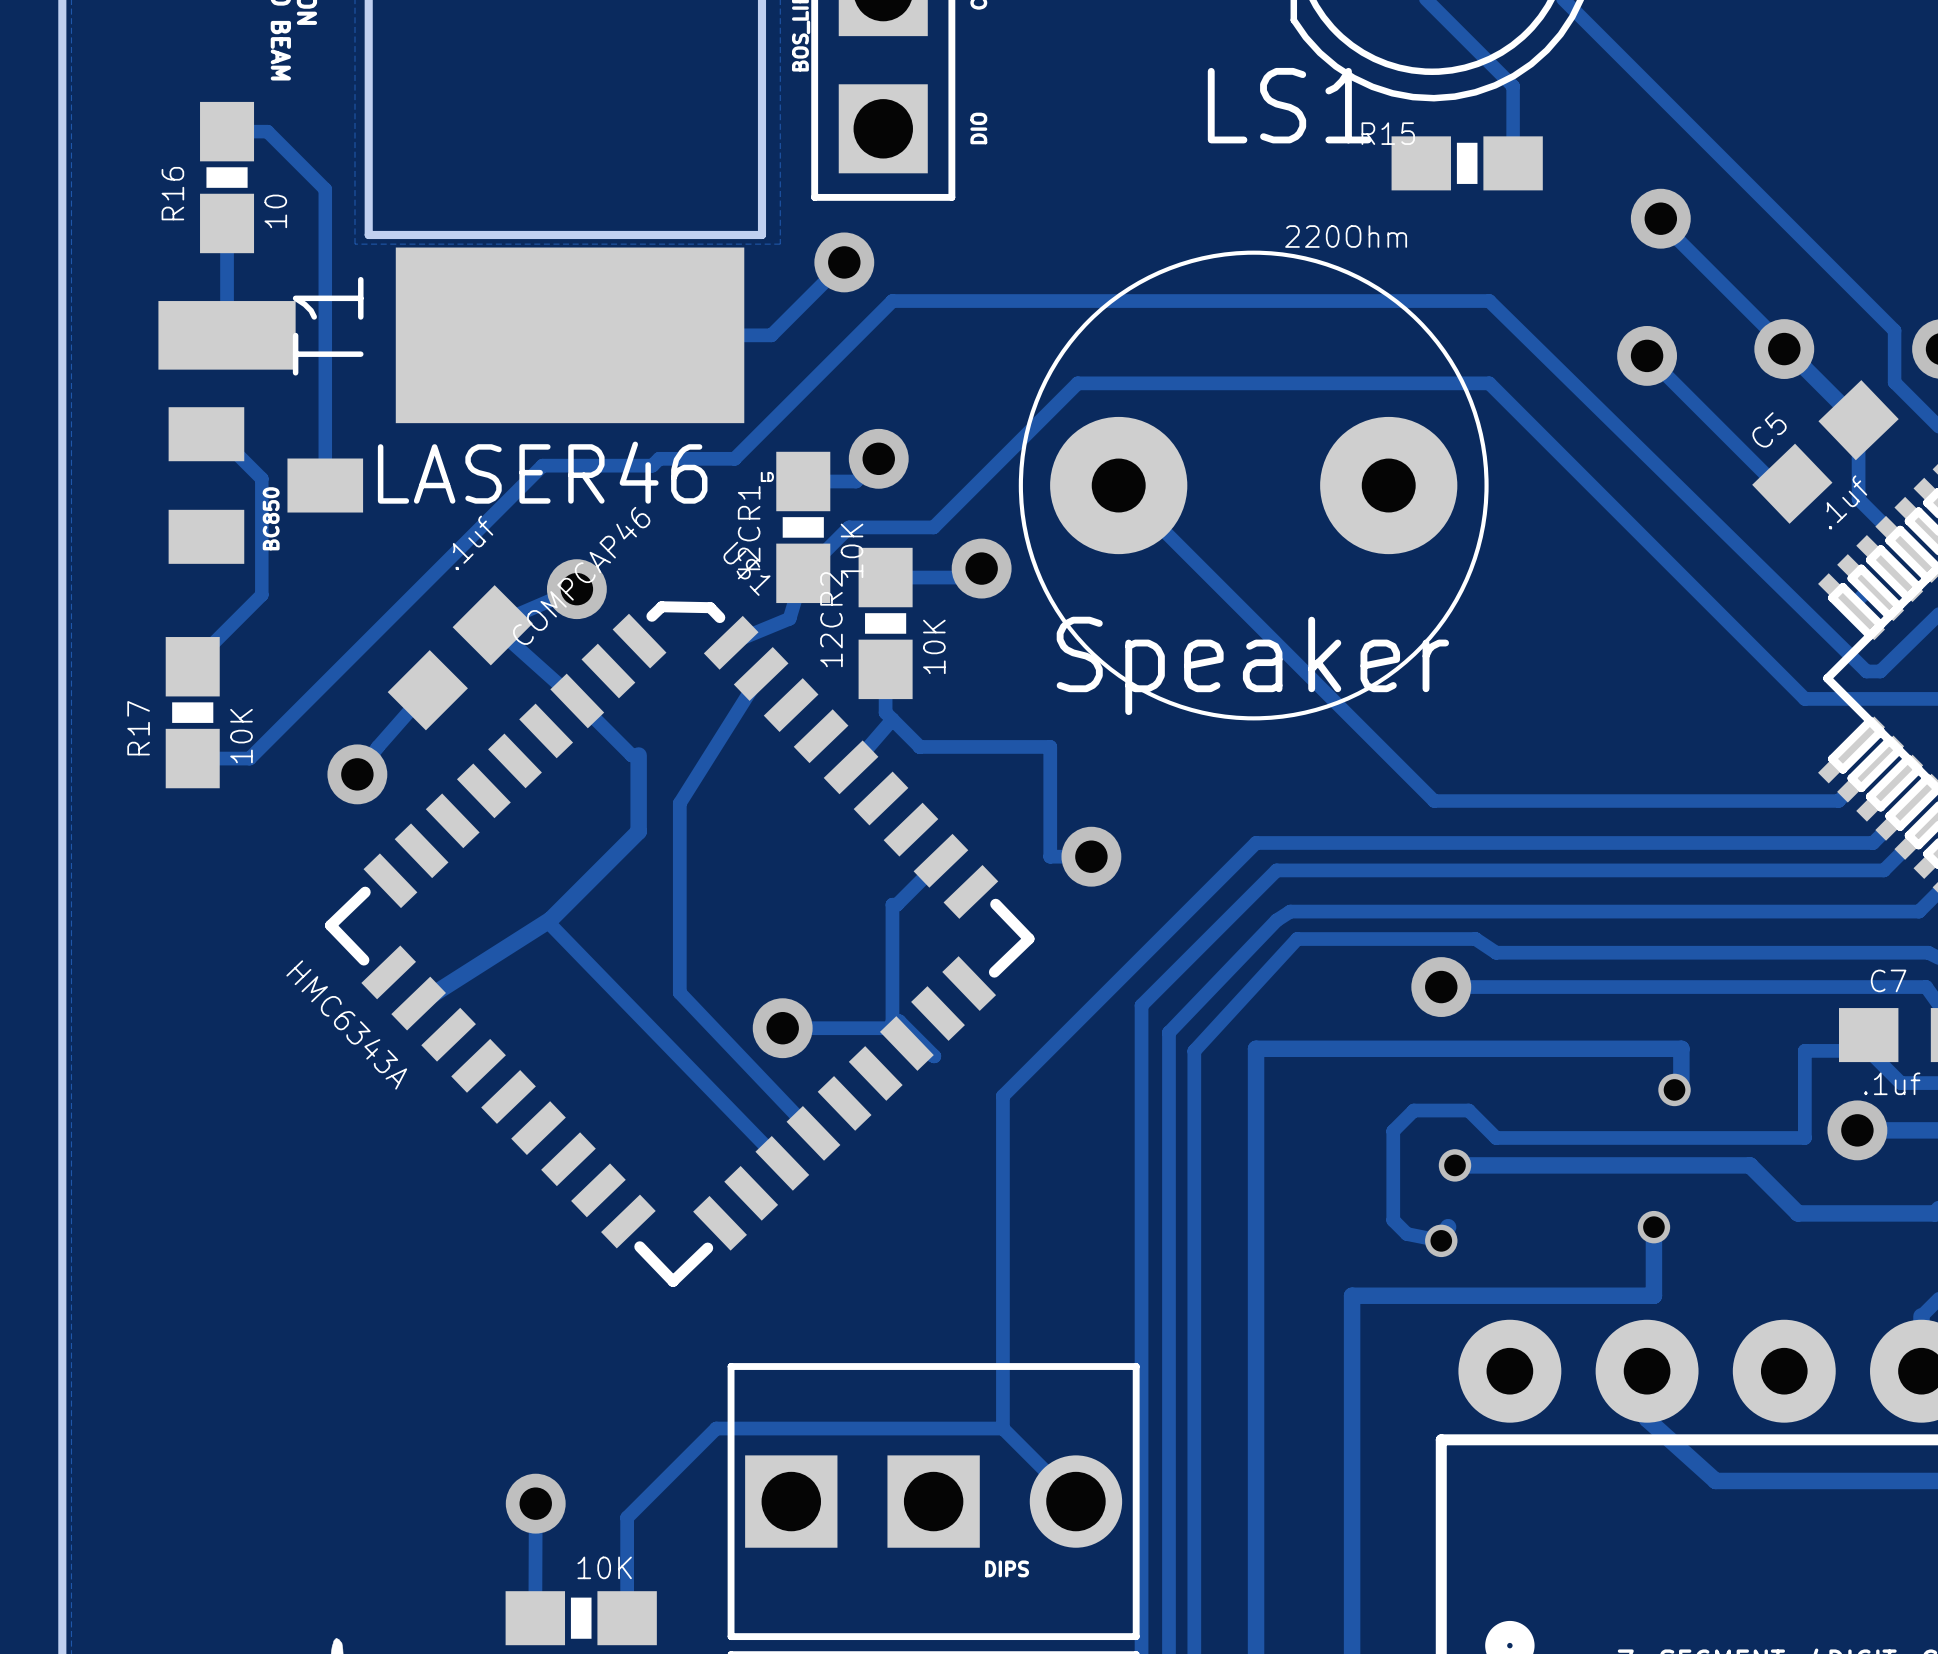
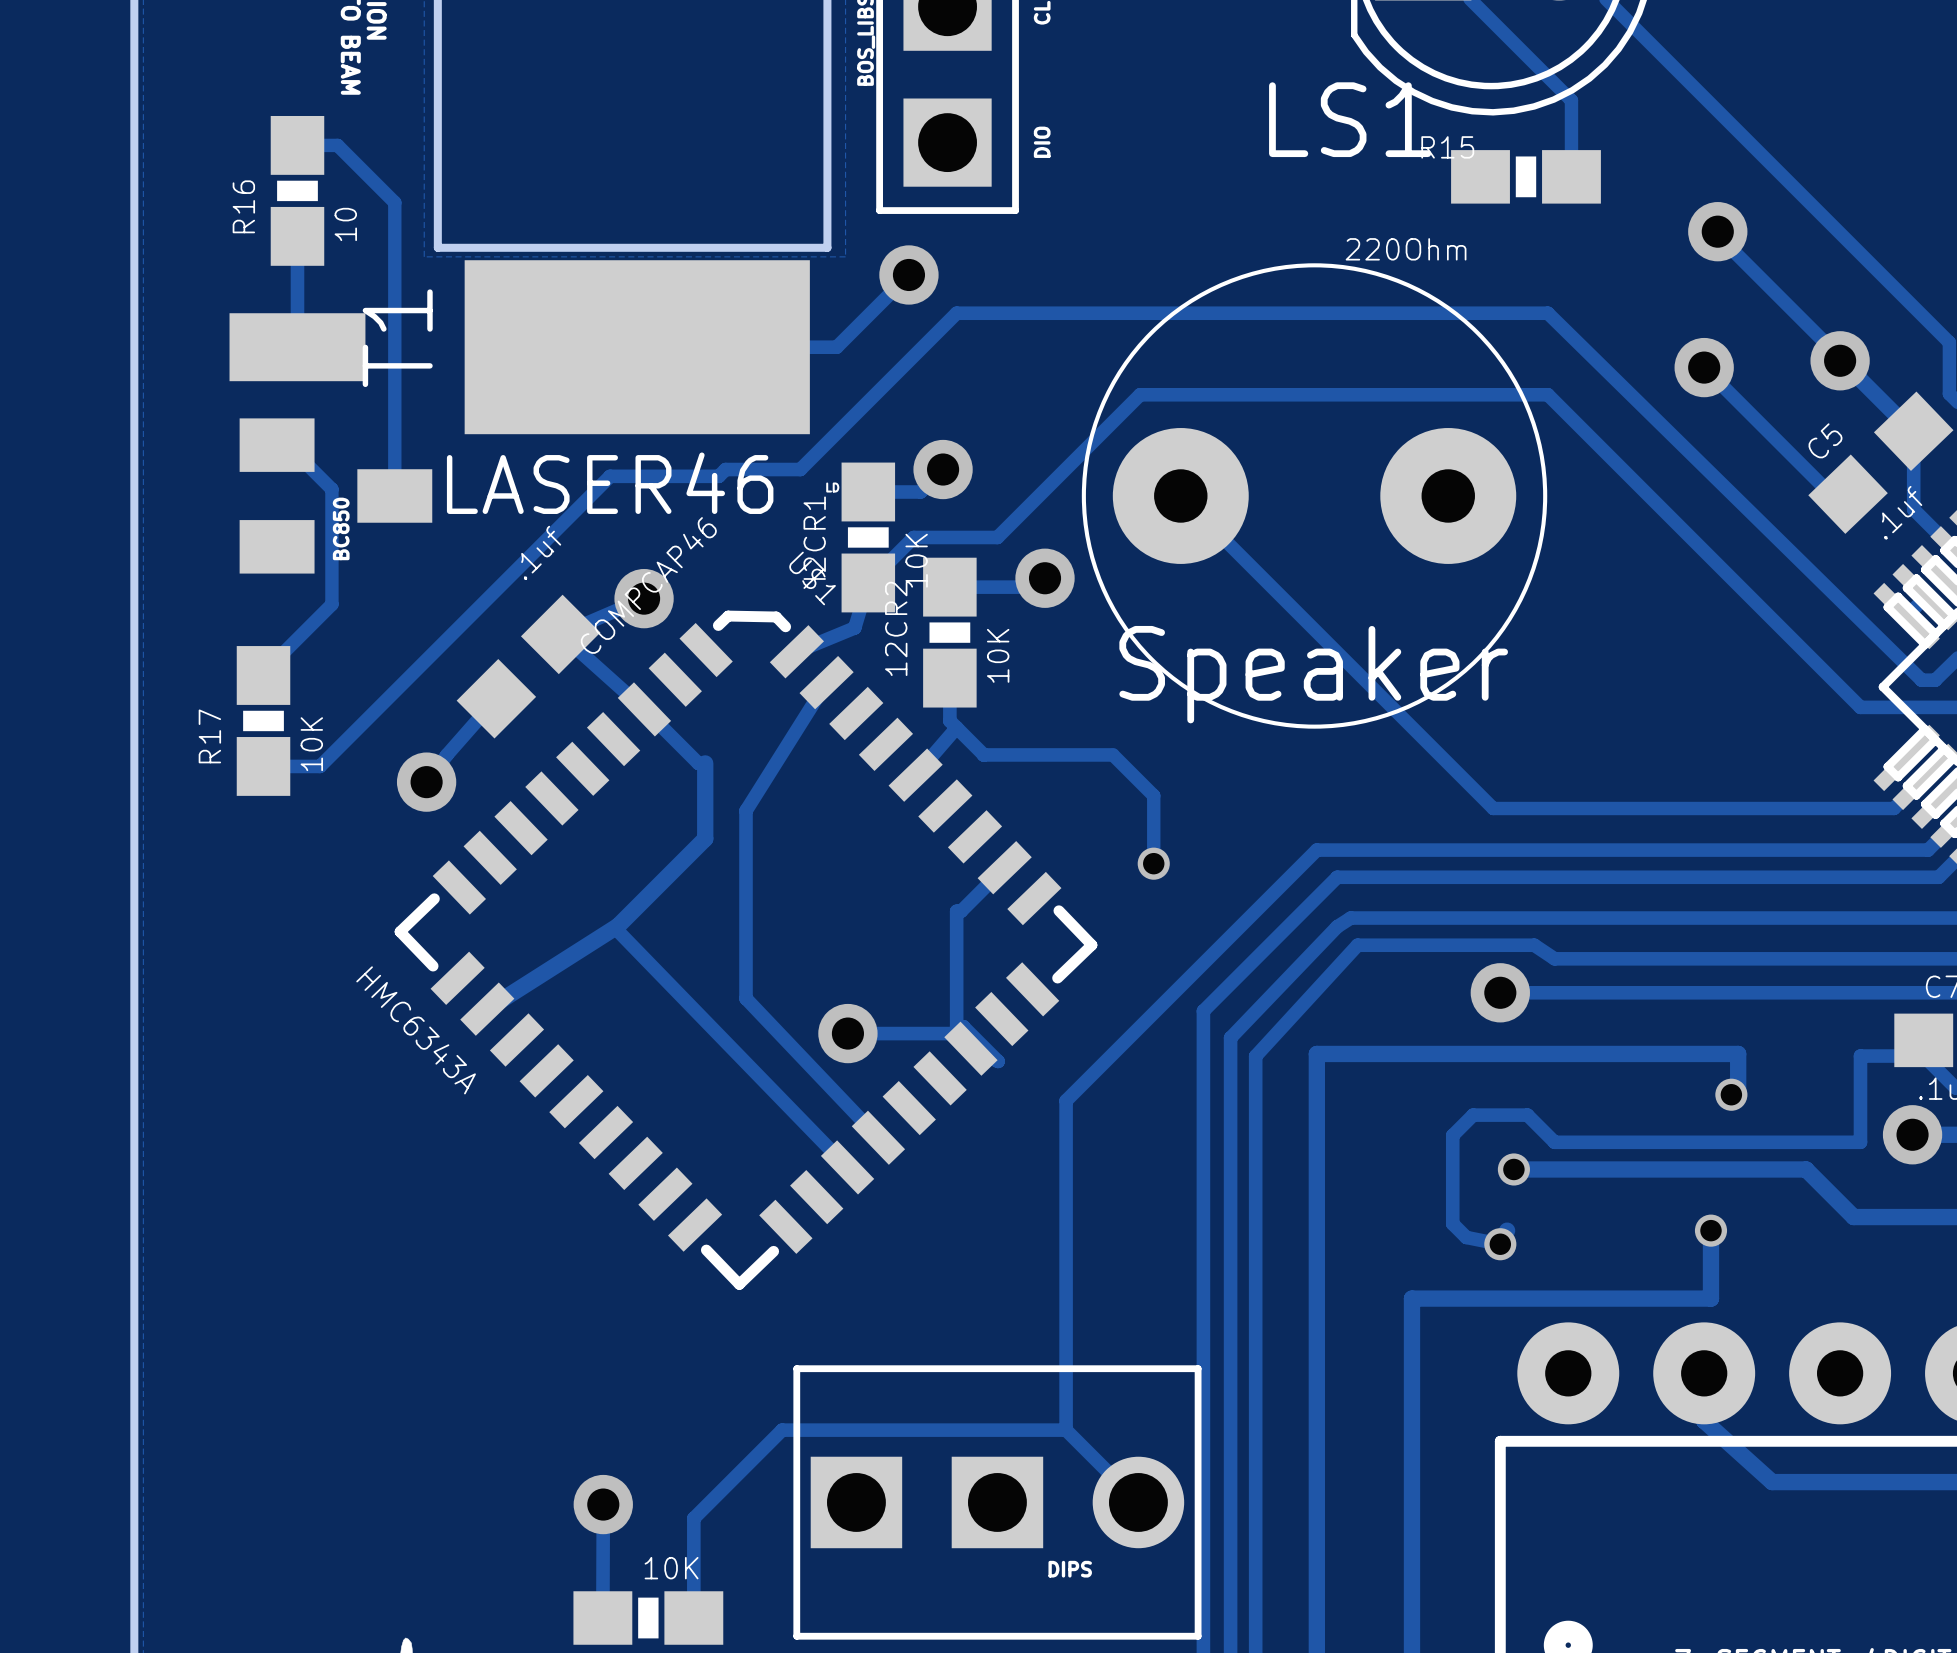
track: (1050, 746) (1050, 856) (1091, 856) -> (1112, 754) (1153, 795) (1153, 863)
via size: [1061, 826, 1122, 887] -> [1137, 847, 1170, 880]

